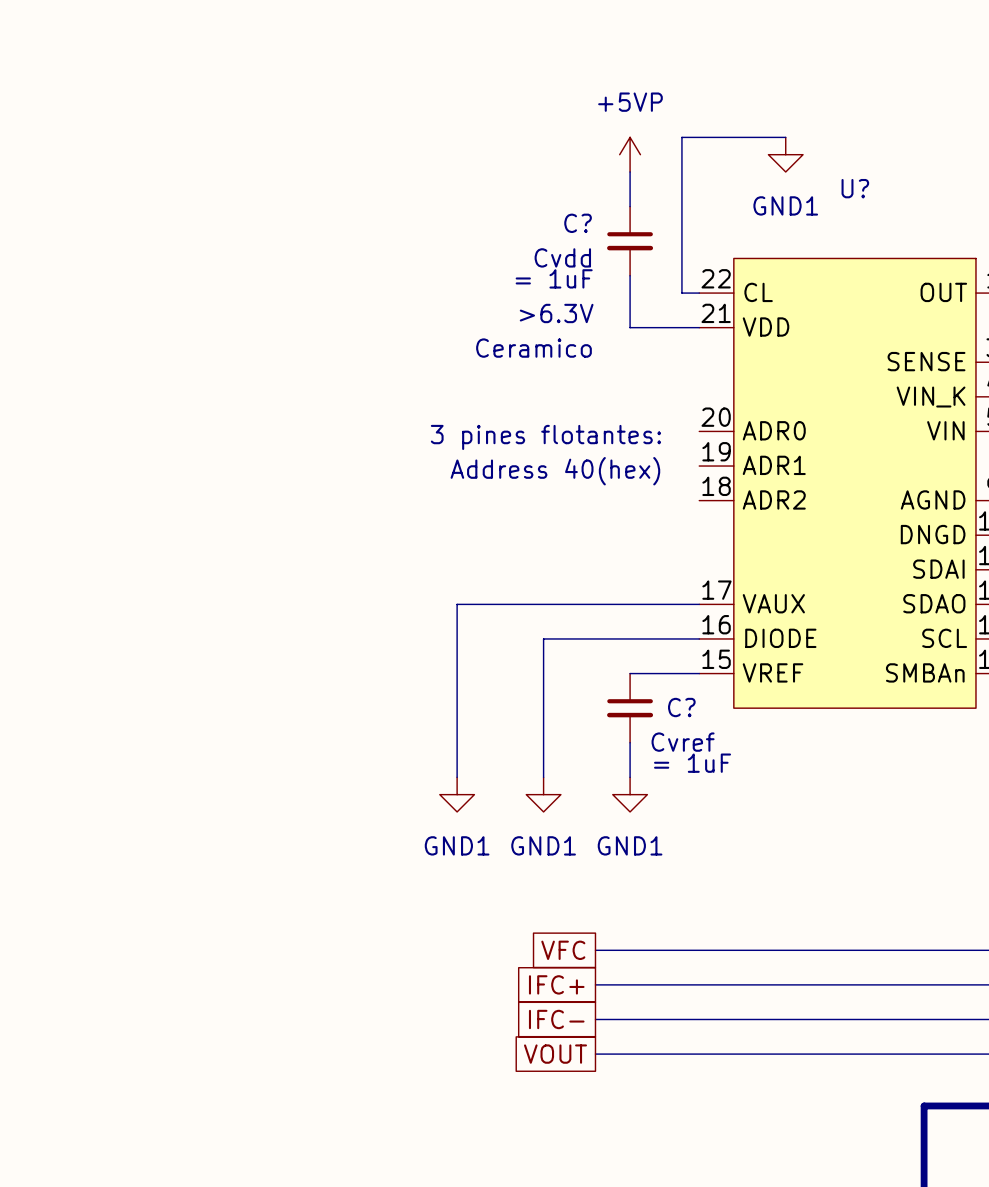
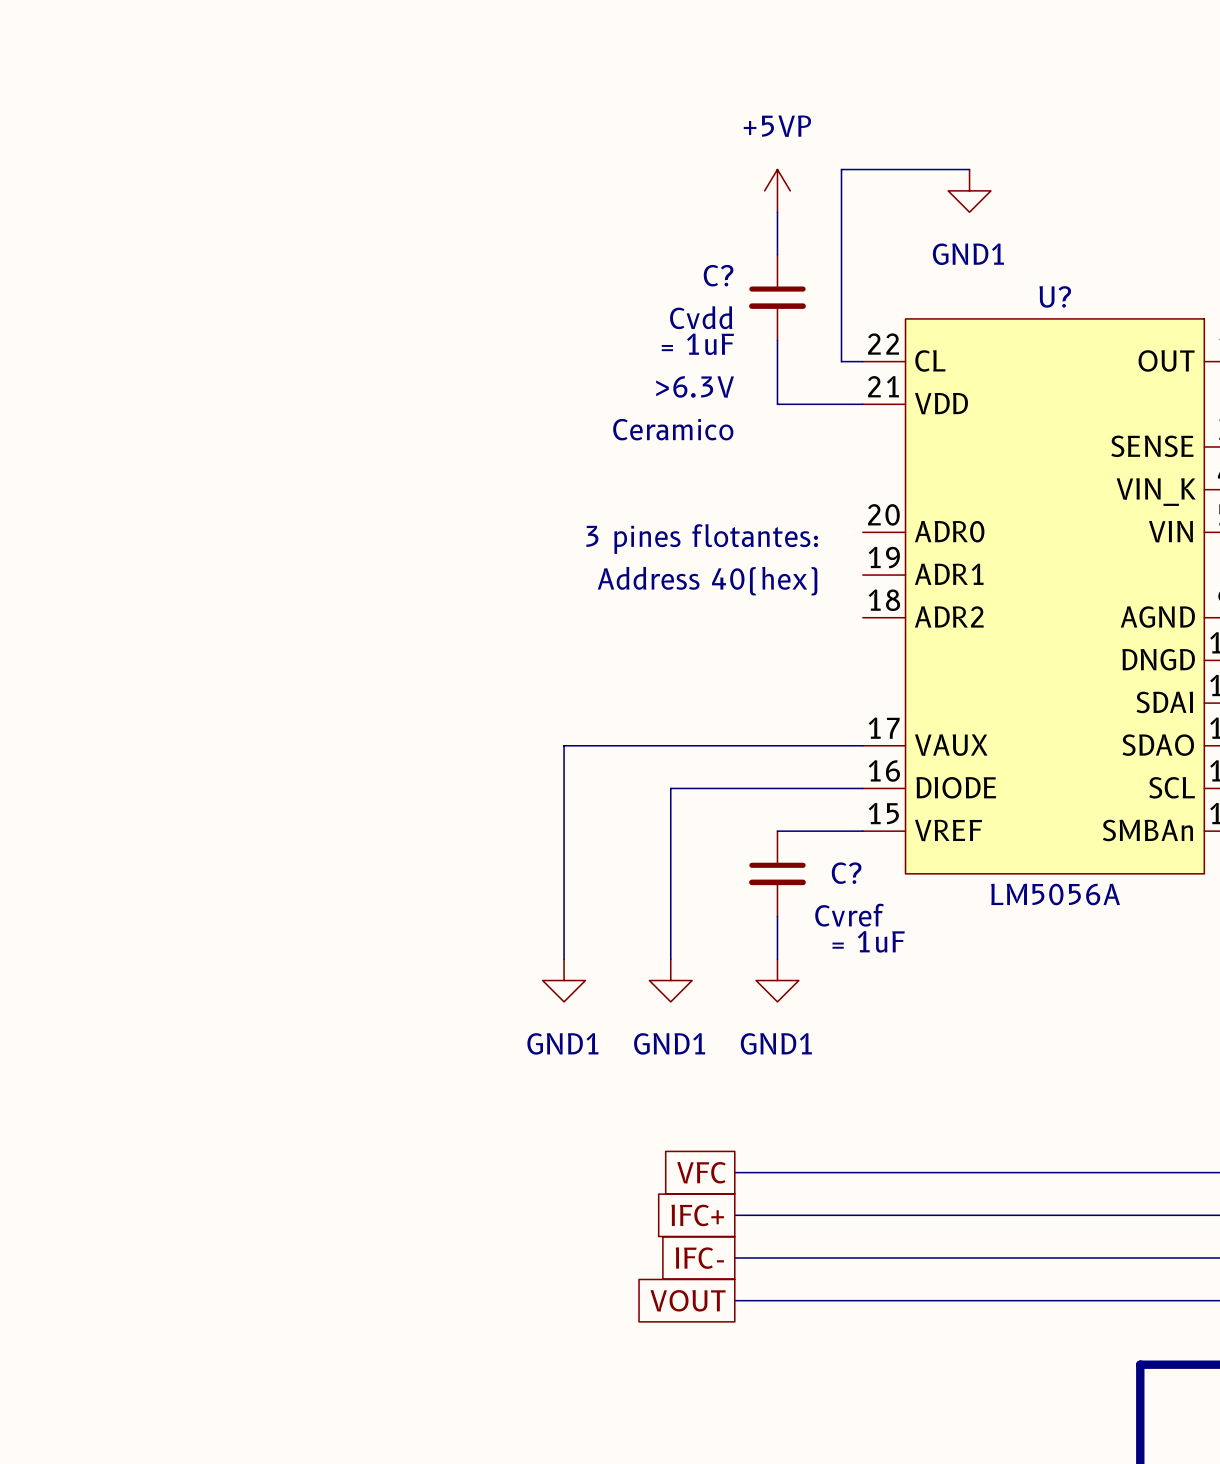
U? name position: U? (855, 188) -> U? (1055, 296)
U? value: none -> LM5056A (1055, 894)

